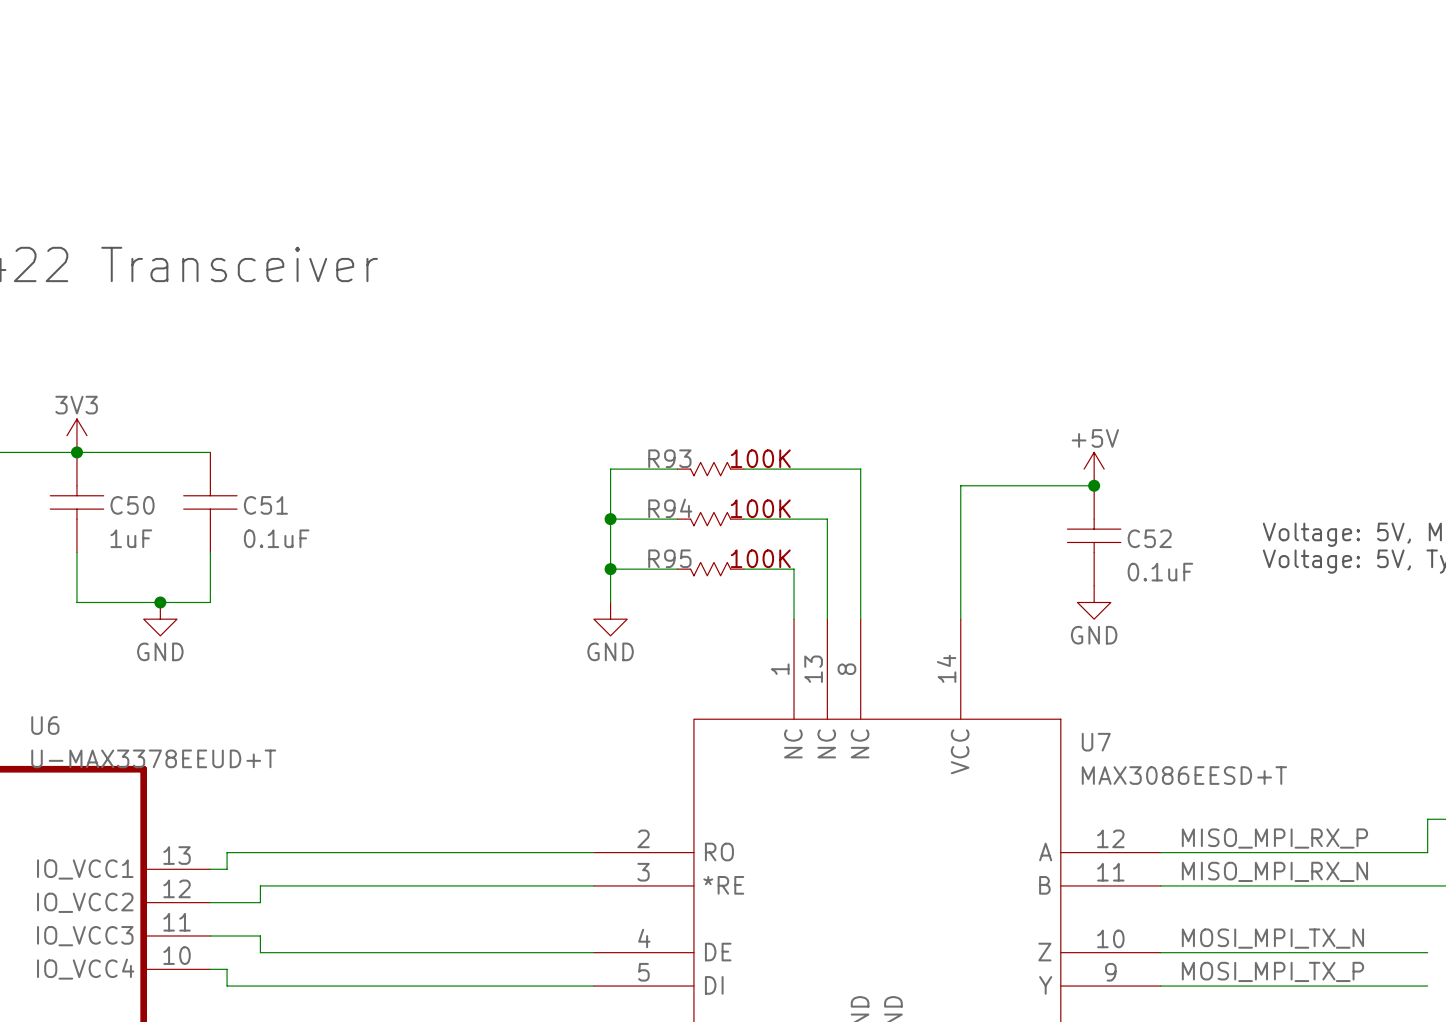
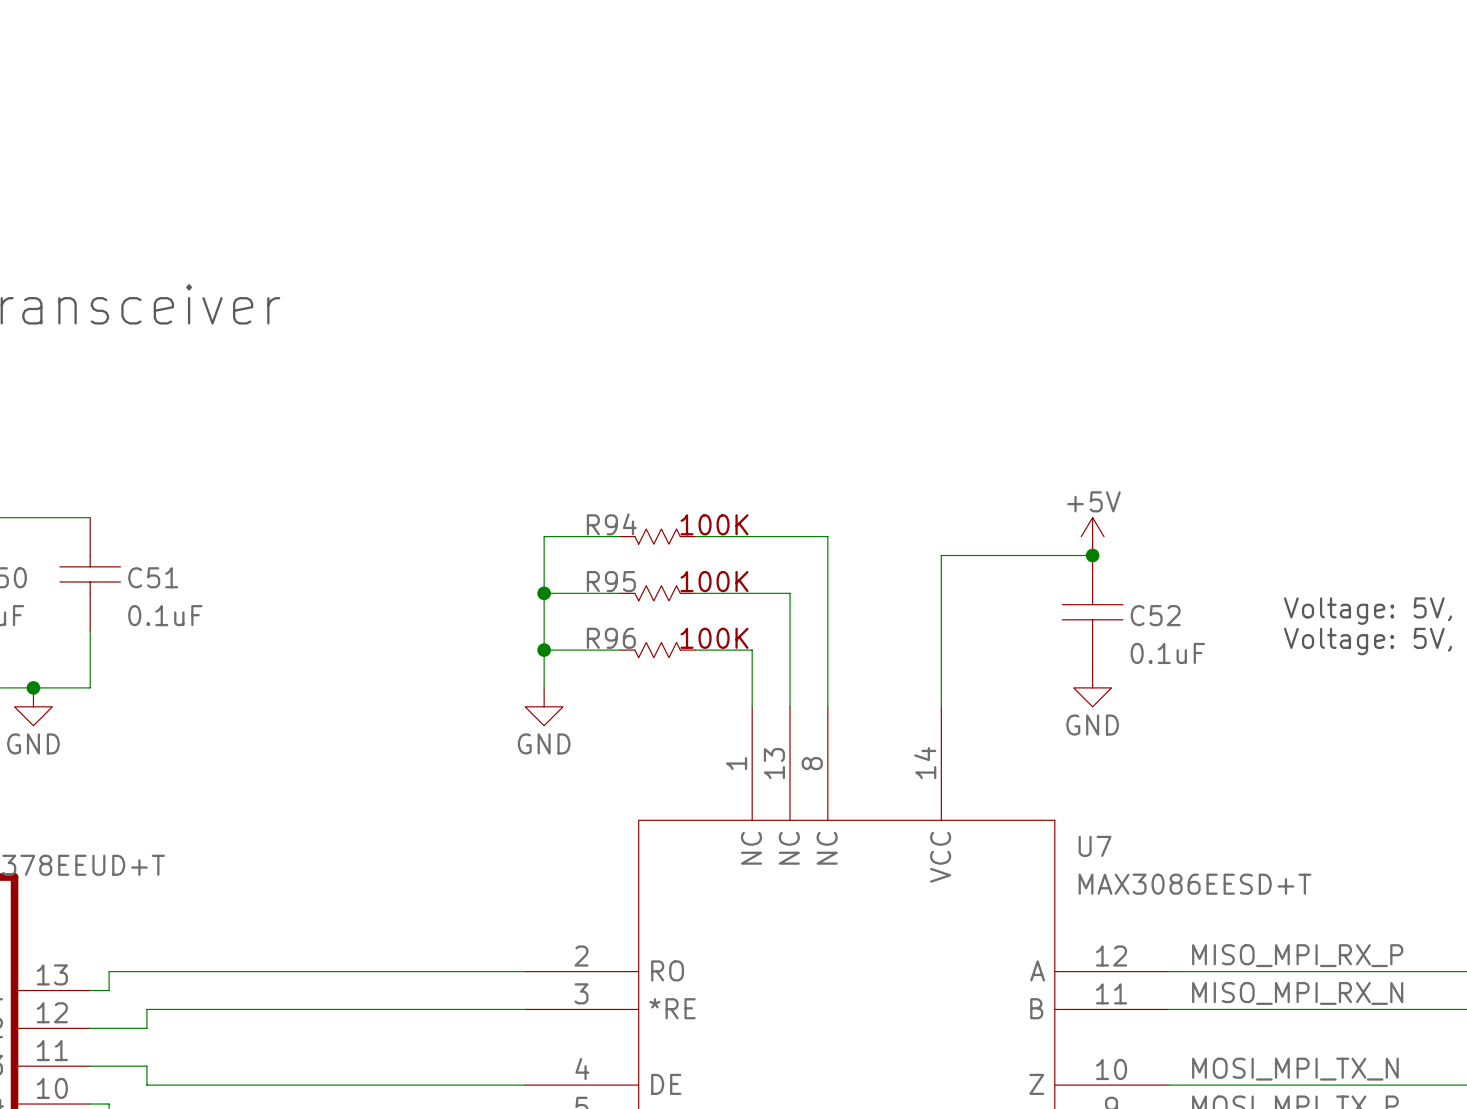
R93 name: R93 (669, 458) -> R94 (611, 524)
R94 name: R94 (670, 508) -> R95 (611, 581)
R95 name: R95 (669, 558) -> R96 (611, 638)

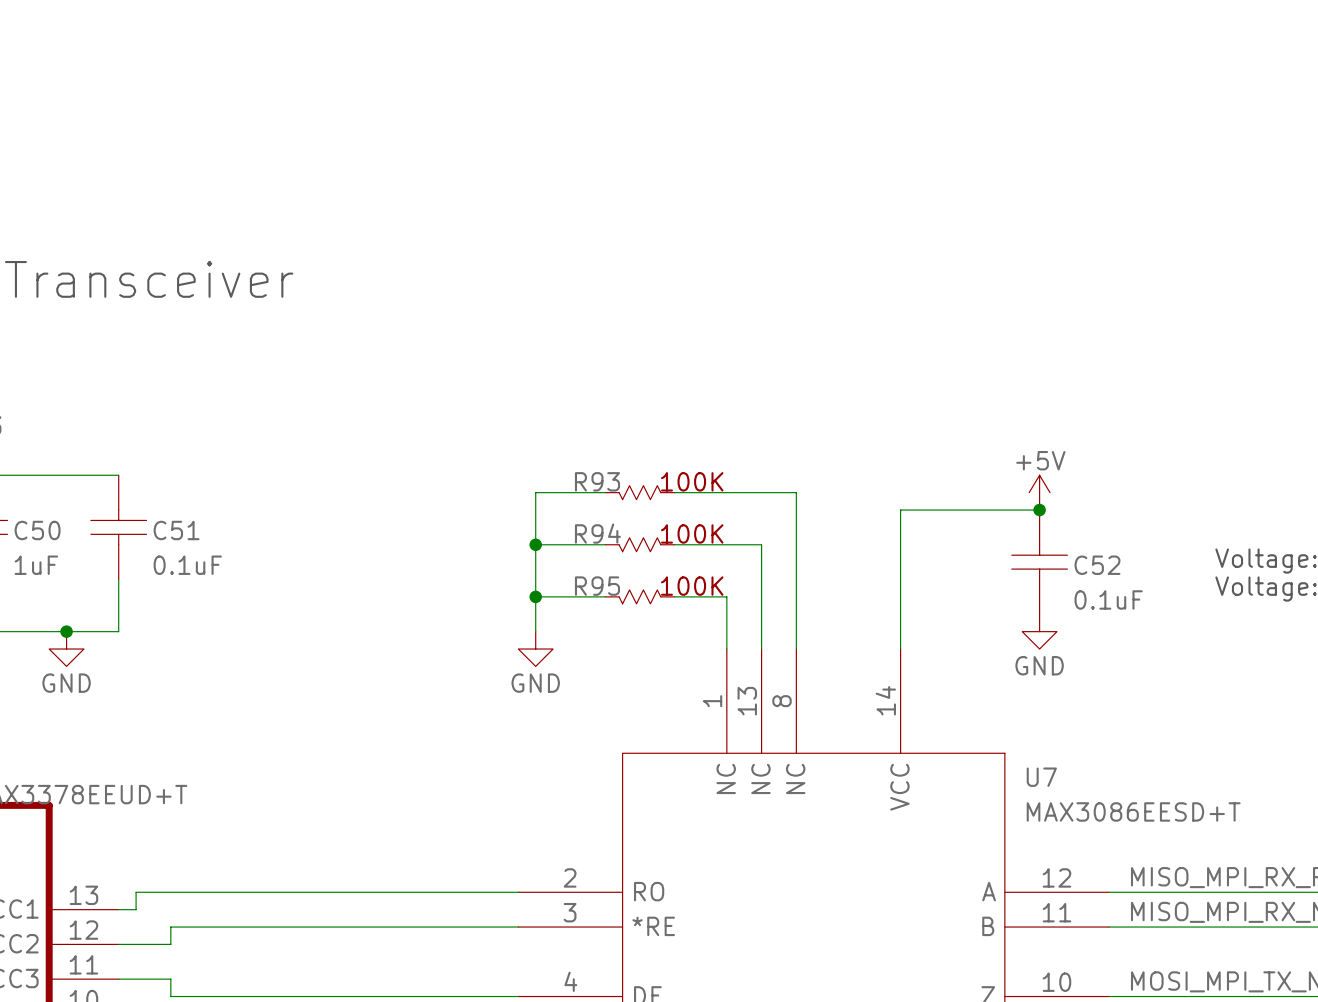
R94 name: R94 (611, 524) -> R93 (597, 481)
R95 name: R95 (611, 581) -> R94 (597, 533)
R96 name: R96 (611, 638) -> R95 (597, 586)

